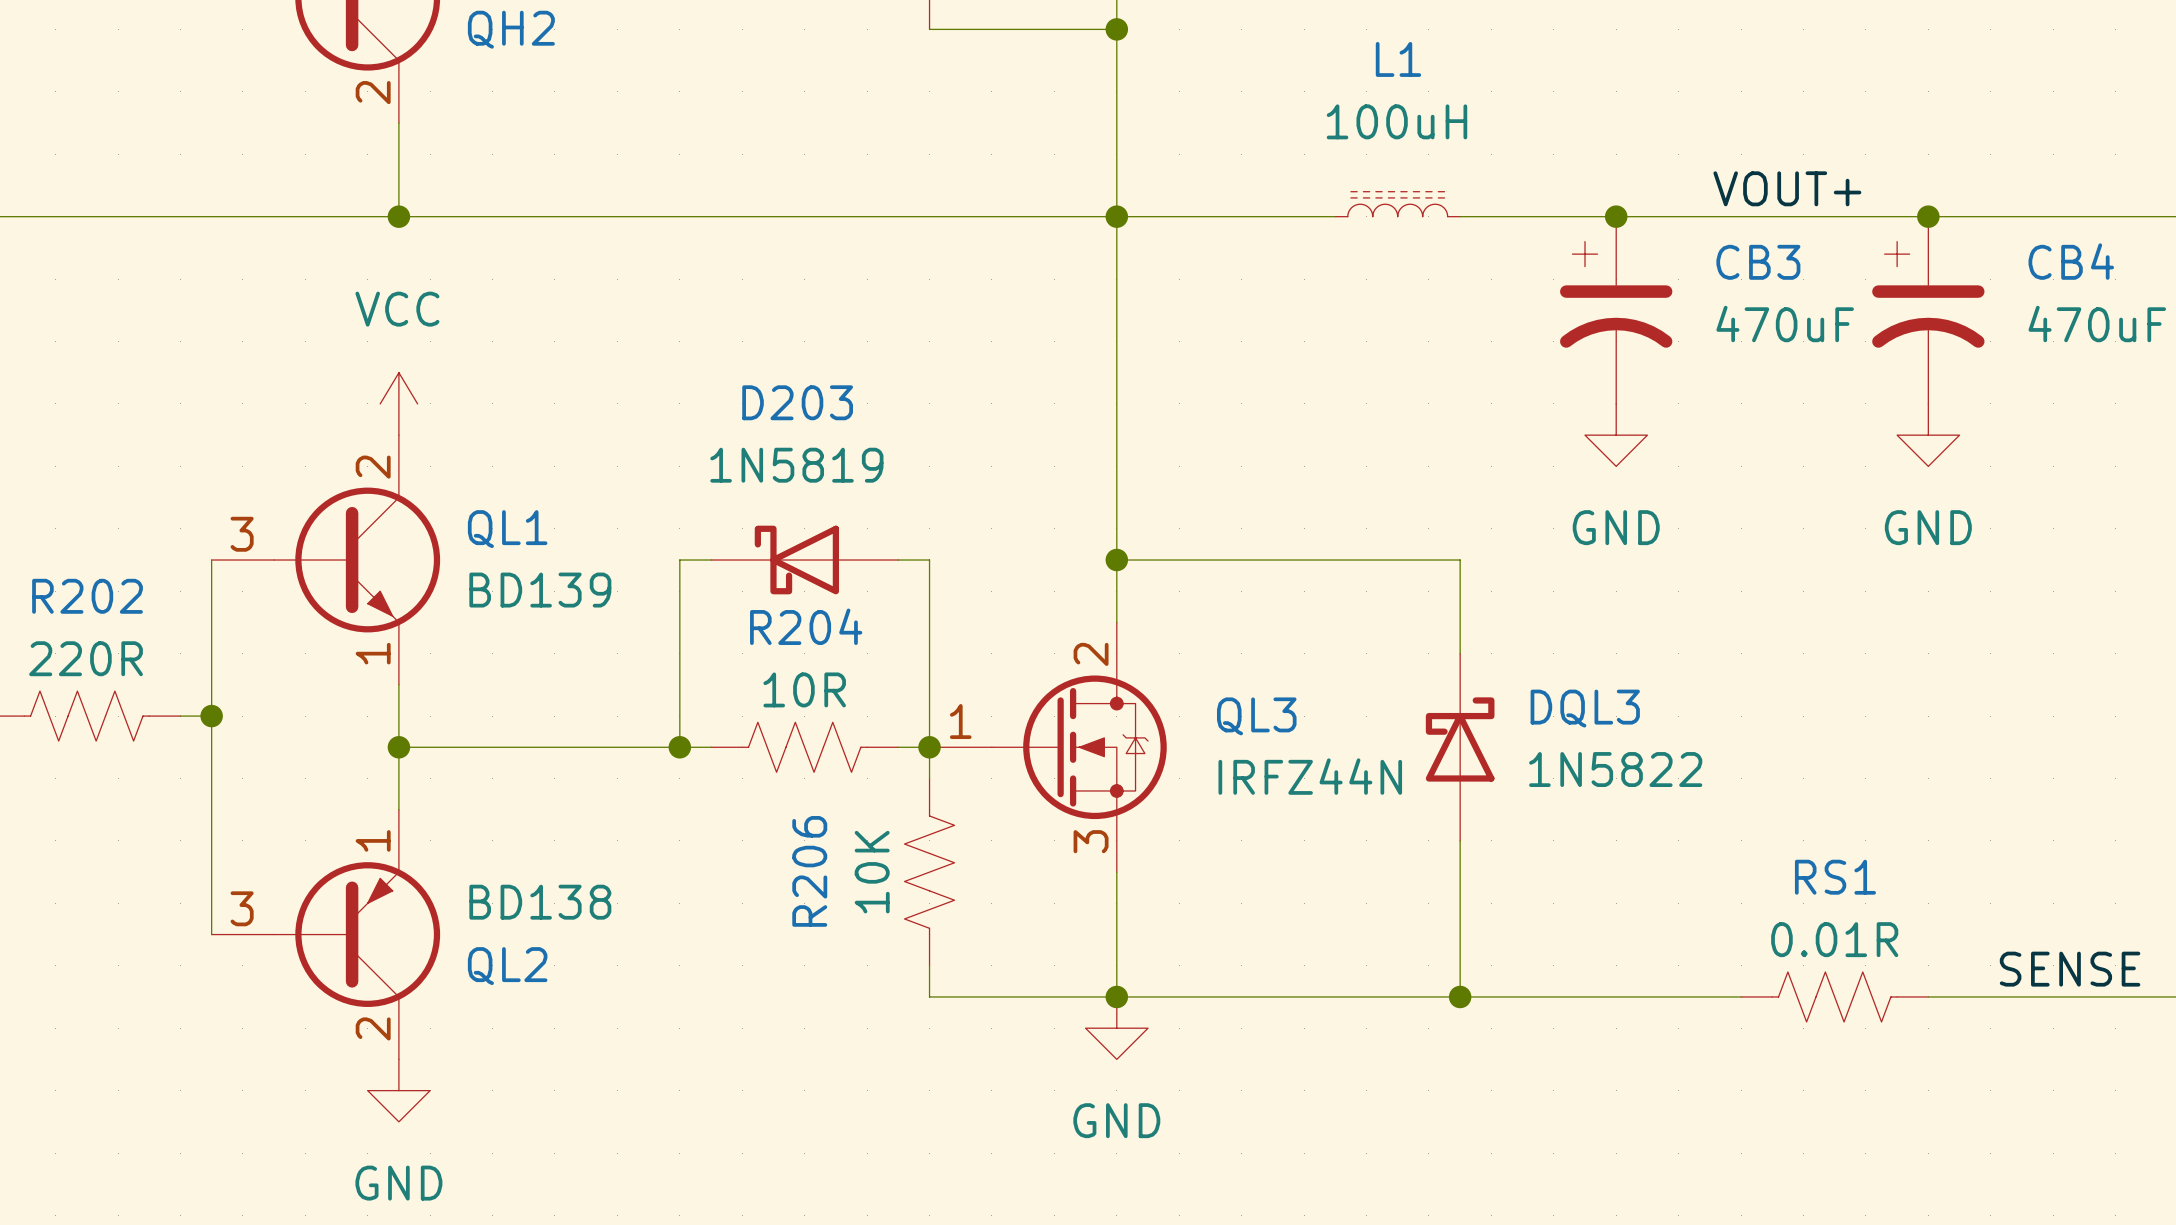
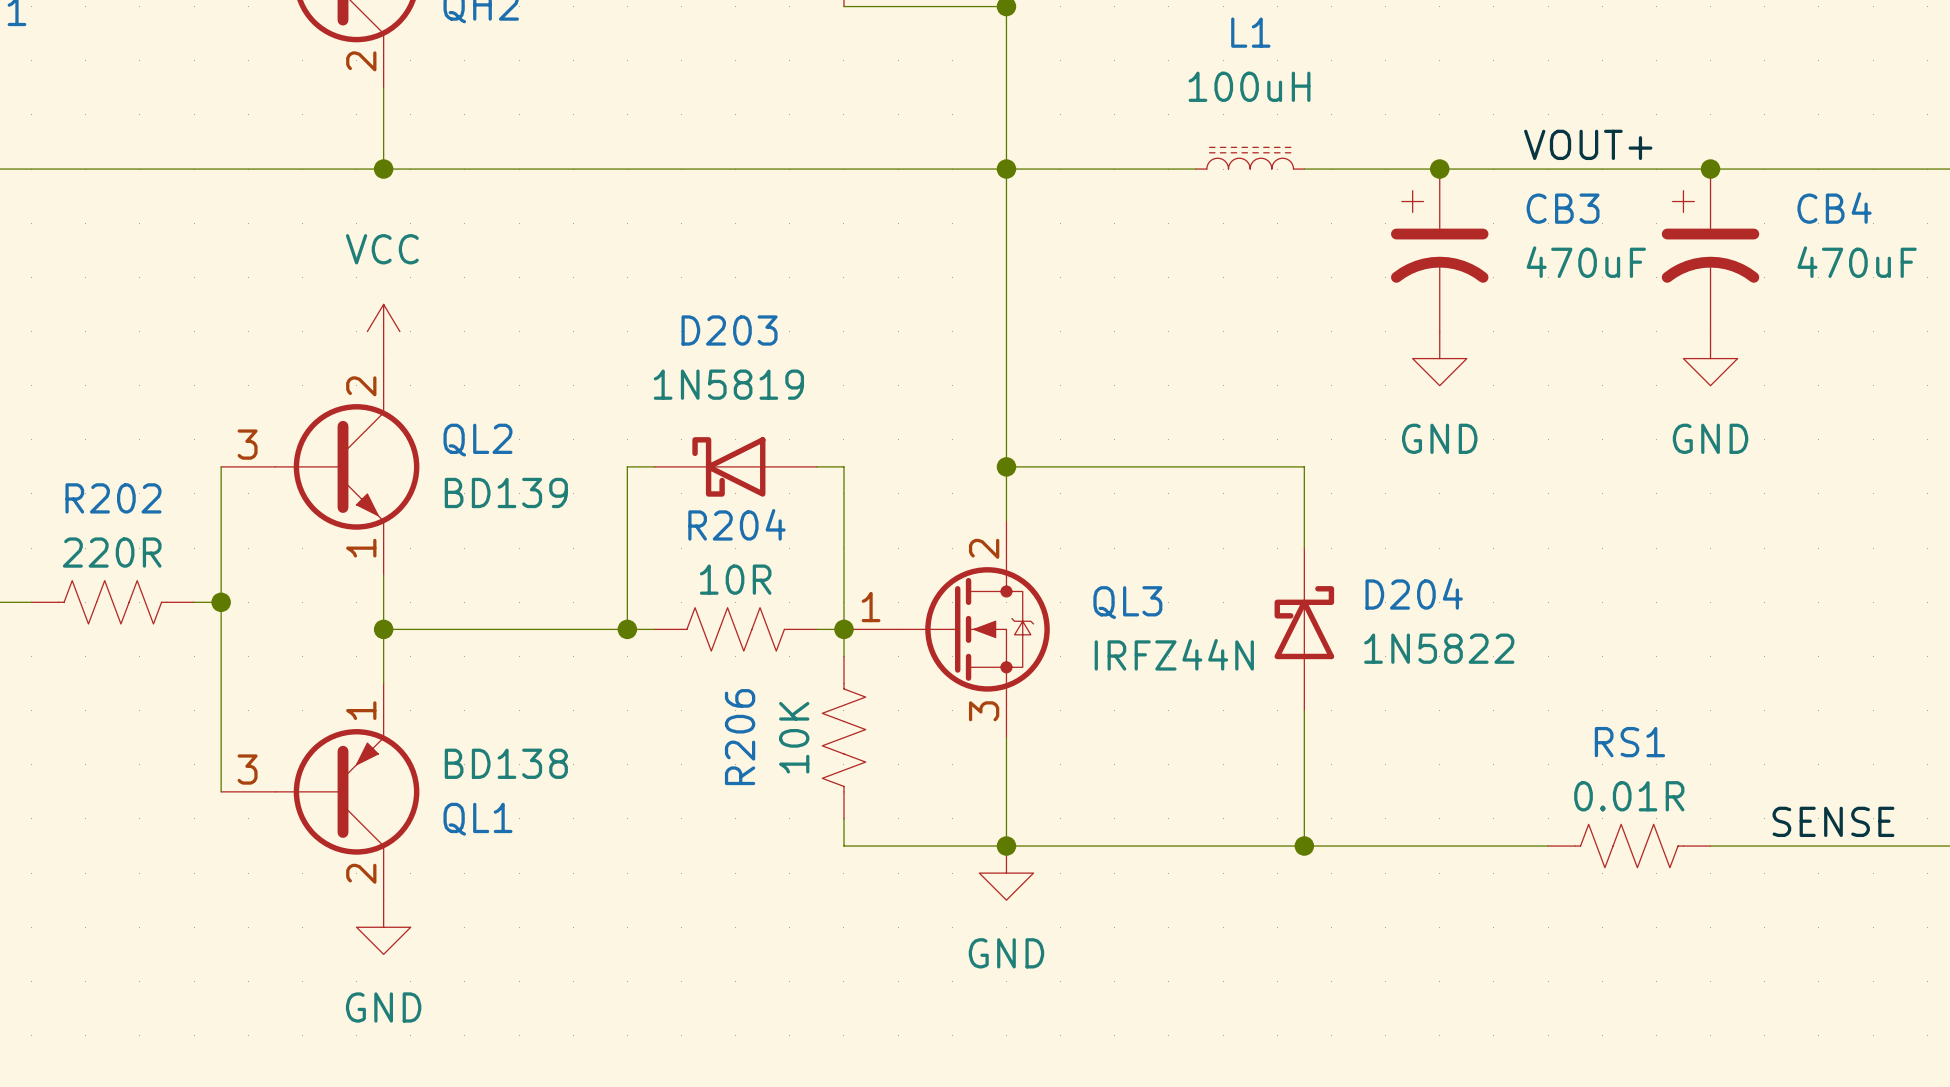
QL1 name: QL1 (507, 529) -> QL2 (477, 440)
DQL3 name: DQL3 (1585, 708) -> D204 (1414, 593)
QL2 name: QL2 (507, 966) -> QL1 (477, 819)

